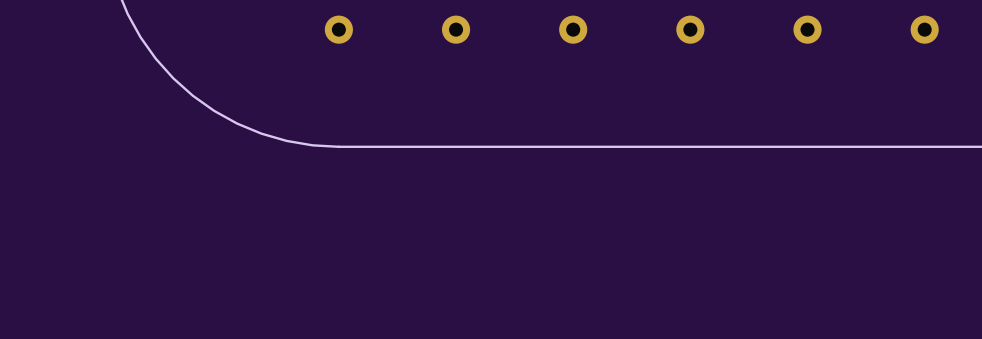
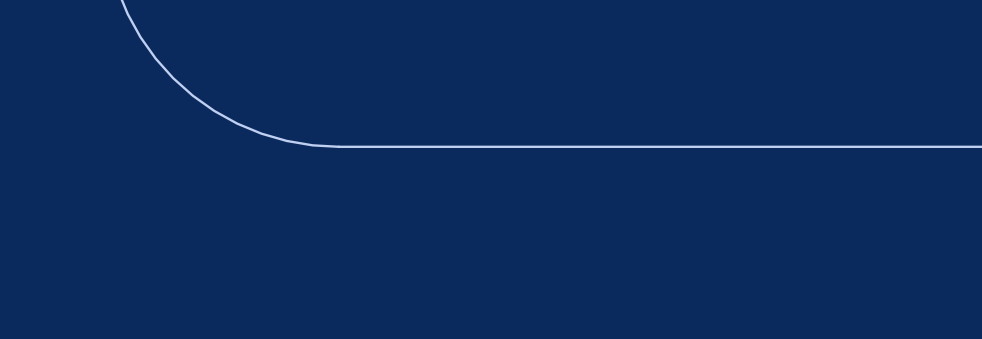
via: (338, 29) -> none
via: (456, 29) -> none
via: (573, 29) -> none
via: (690, 29) -> none
via: (807, 29) -> none
via: (924, 29) -> none

